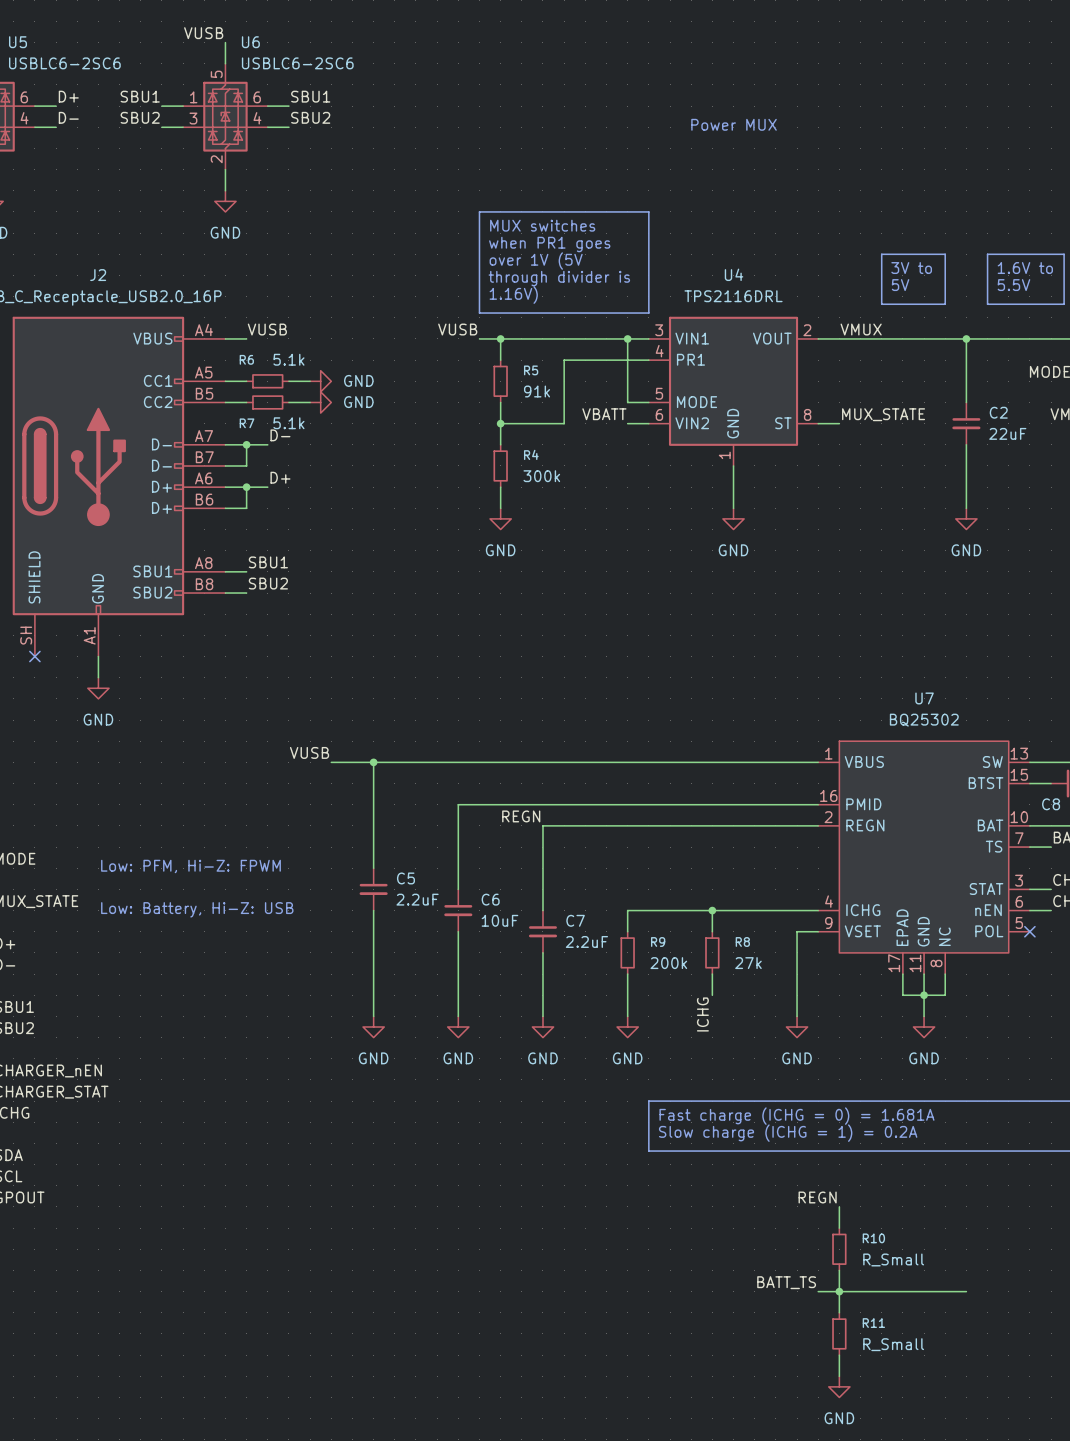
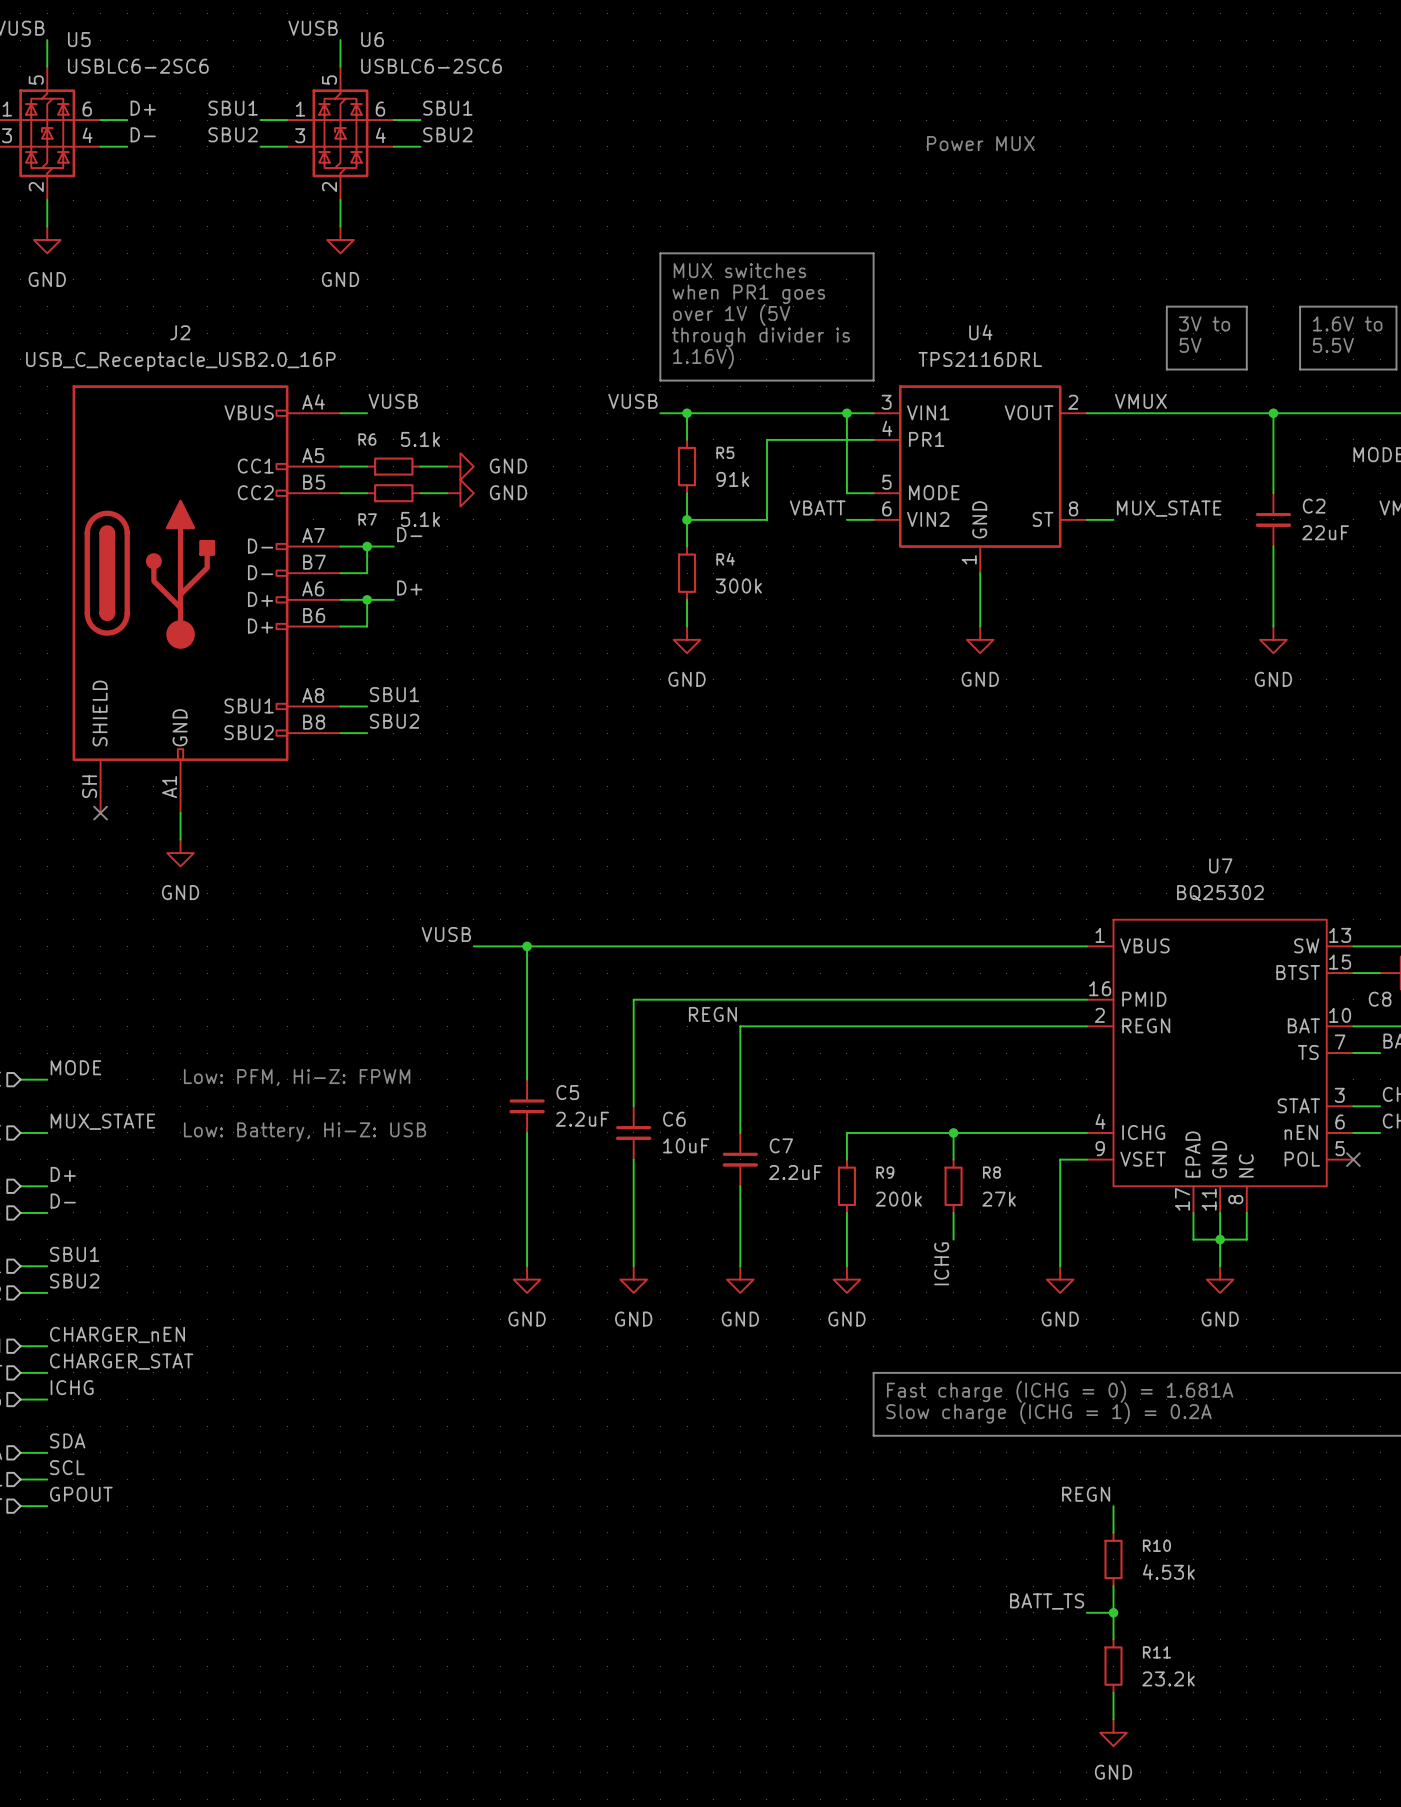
R10 value: R_Small (893, 1259) -> 4.53k (1168, 1571)
wire: (839, 1291) (966, 1291) -> none
R11 value: R_Small (893, 1344) -> 23.2k (1168, 1678)

